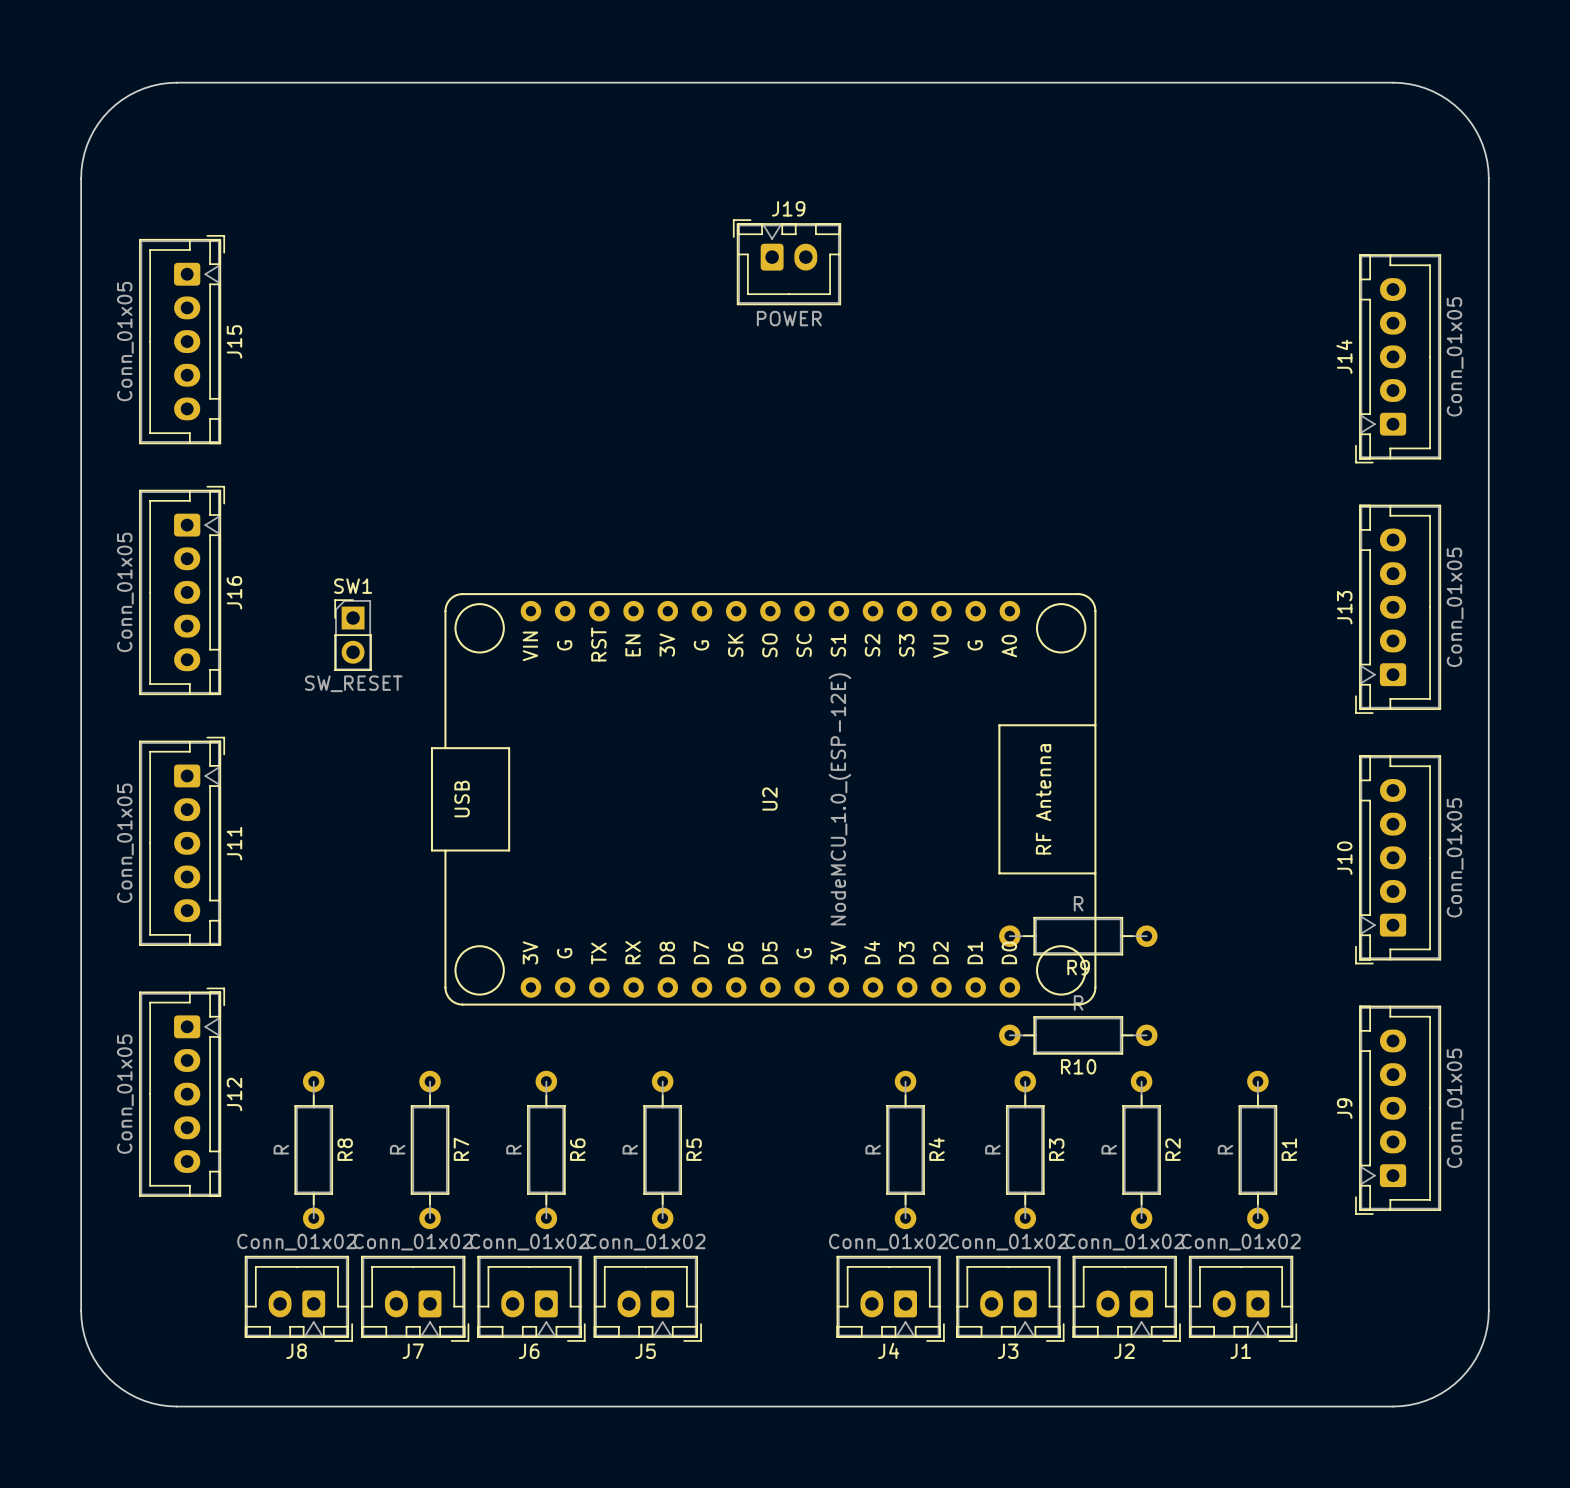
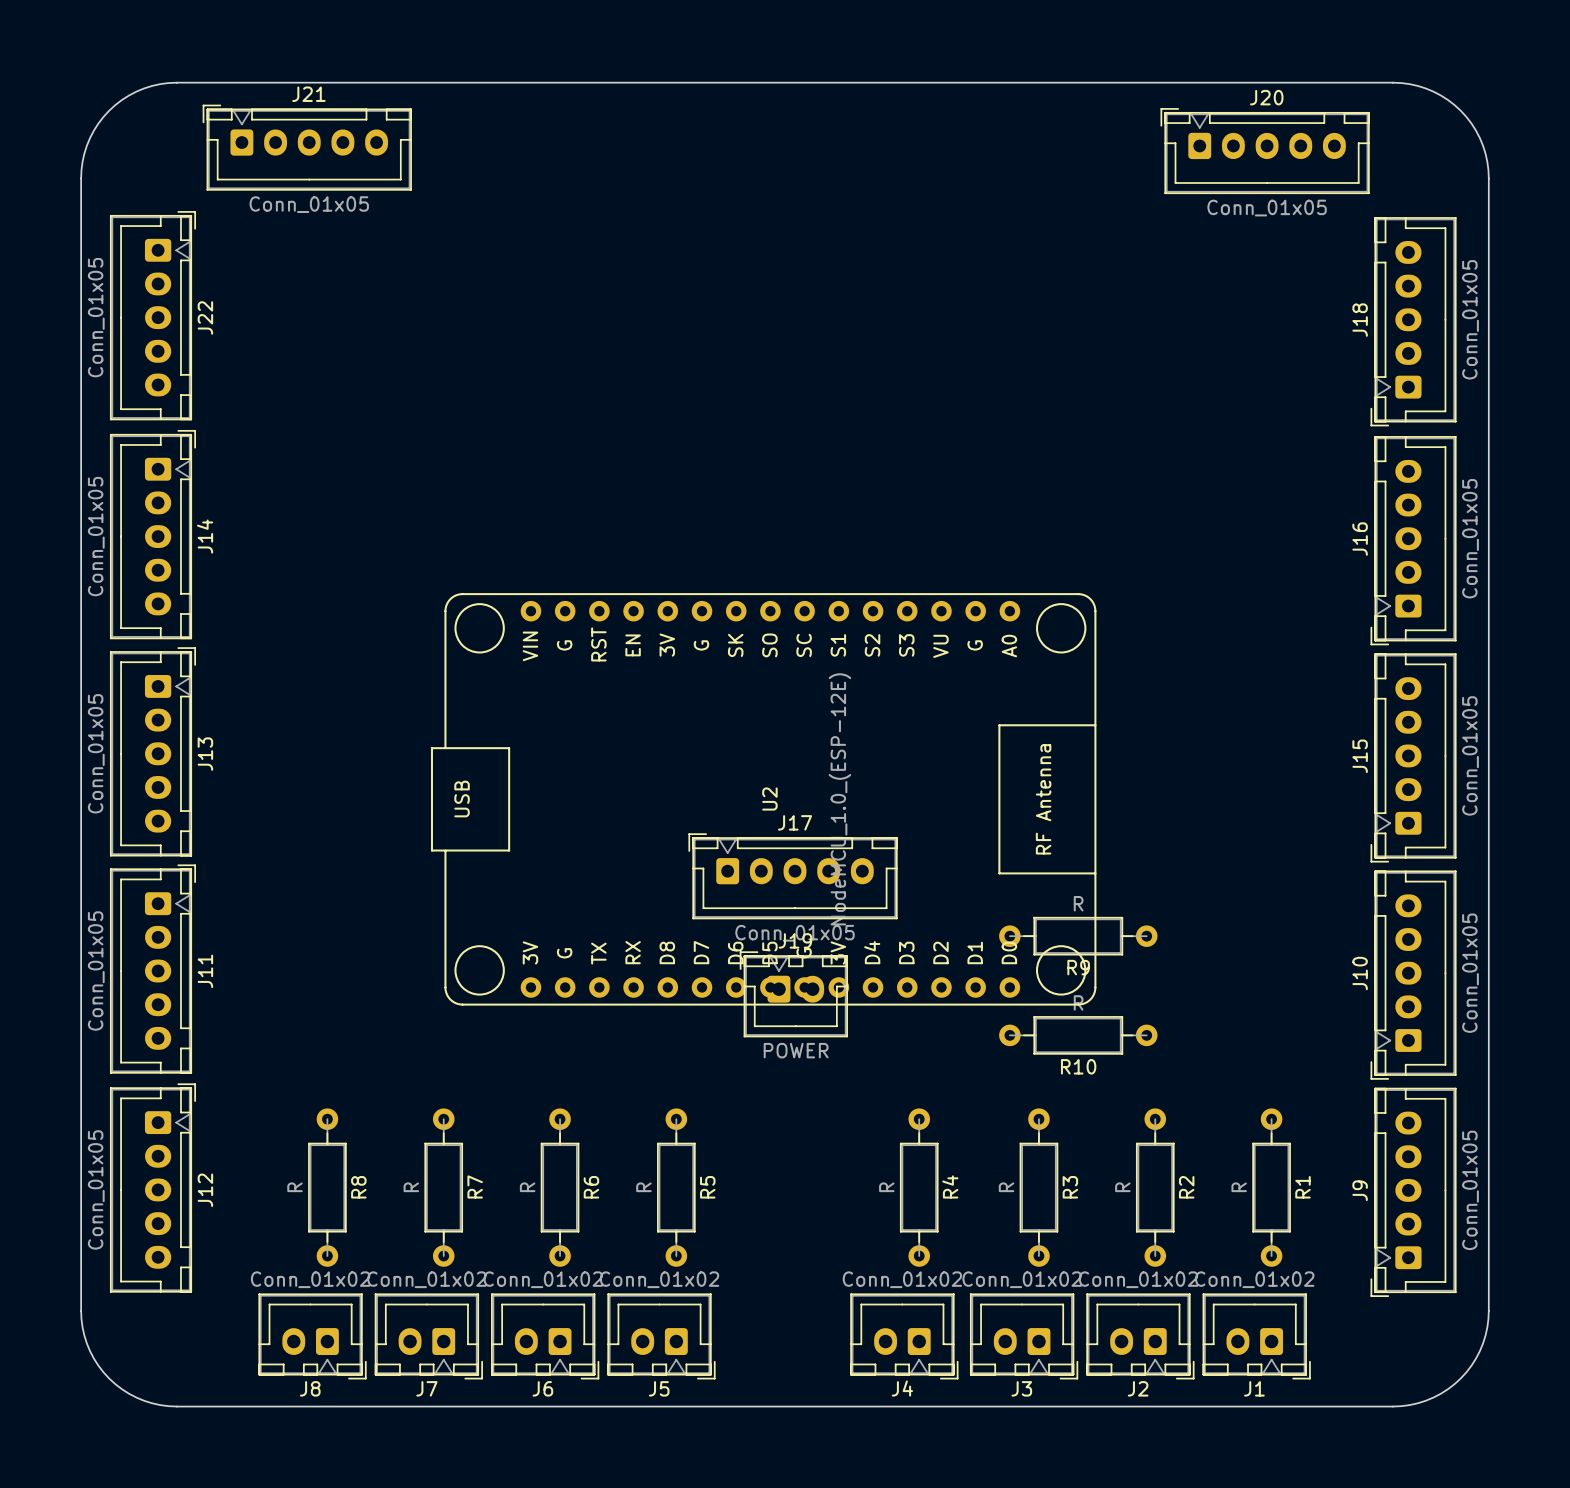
J21: none -> Conn_01x05 (307, 147)
J20: none -> Conn_01x05 (1265, 151)
J19 position: (787, 262) -> (793, 994)
J22: none -> Conn_01x05 (152, 315)
J18: none -> Conn_01x05 (1413, 321)
J15 rotation: 0° (182, 339) -> 180° (1413, 757)
J15 position: (182, 339) -> (1413, 757)
J14 rotation: 0° (1398, 358) -> 180° (152, 534)
J14 position: (1398, 358) -> (152, 534)
J16 rotation: 0° (182, 590) -> 180° (1413, 540)
J16 position: (182, 590) -> (1413, 540)
J13 rotation: 0° (1398, 609) -> 180° (152, 751)
J13 position: (1398, 609) -> (152, 751)
SW1: SW_RESET (353, 635) -> none
J11 position: (182, 841) -> (152, 969)
J10 position: (1398, 859) -> (1413, 975)
J17: none -> Conn_01x05 (793, 876)
J12 position: (182, 1092) -> (152, 1188)
J9 position: (1398, 1110) -> (1413, 1192)
R8 position: (313, 1149) -> (327, 1187)
R7 position: (430, 1149) -> (443, 1187)
R6 position: (546, 1149) -> (560, 1187)
R5 position: (662, 1149) -> (676, 1187)
R4 position: (905, 1149) -> (919, 1187)
R3 position: (1025, 1149) -> (1038, 1187)
R2 position: (1141, 1149) -> (1155, 1187)
R1 position: (1257, 1149) -> (1271, 1187)
J8 position: (298, 1298) -> (312, 1336)
J7 position: (415, 1298) -> (428, 1336)
J6 position: (531, 1298) -> (545, 1336)
J5 position: (647, 1298) -> (661, 1336)
J4 position: (890, 1298) -> (904, 1336)
J3 position: (1010, 1298) -> (1024, 1336)
J2 position: (1126, 1298) -> (1140, 1336)
J1 position: (1243, 1298) -> (1256, 1336)

